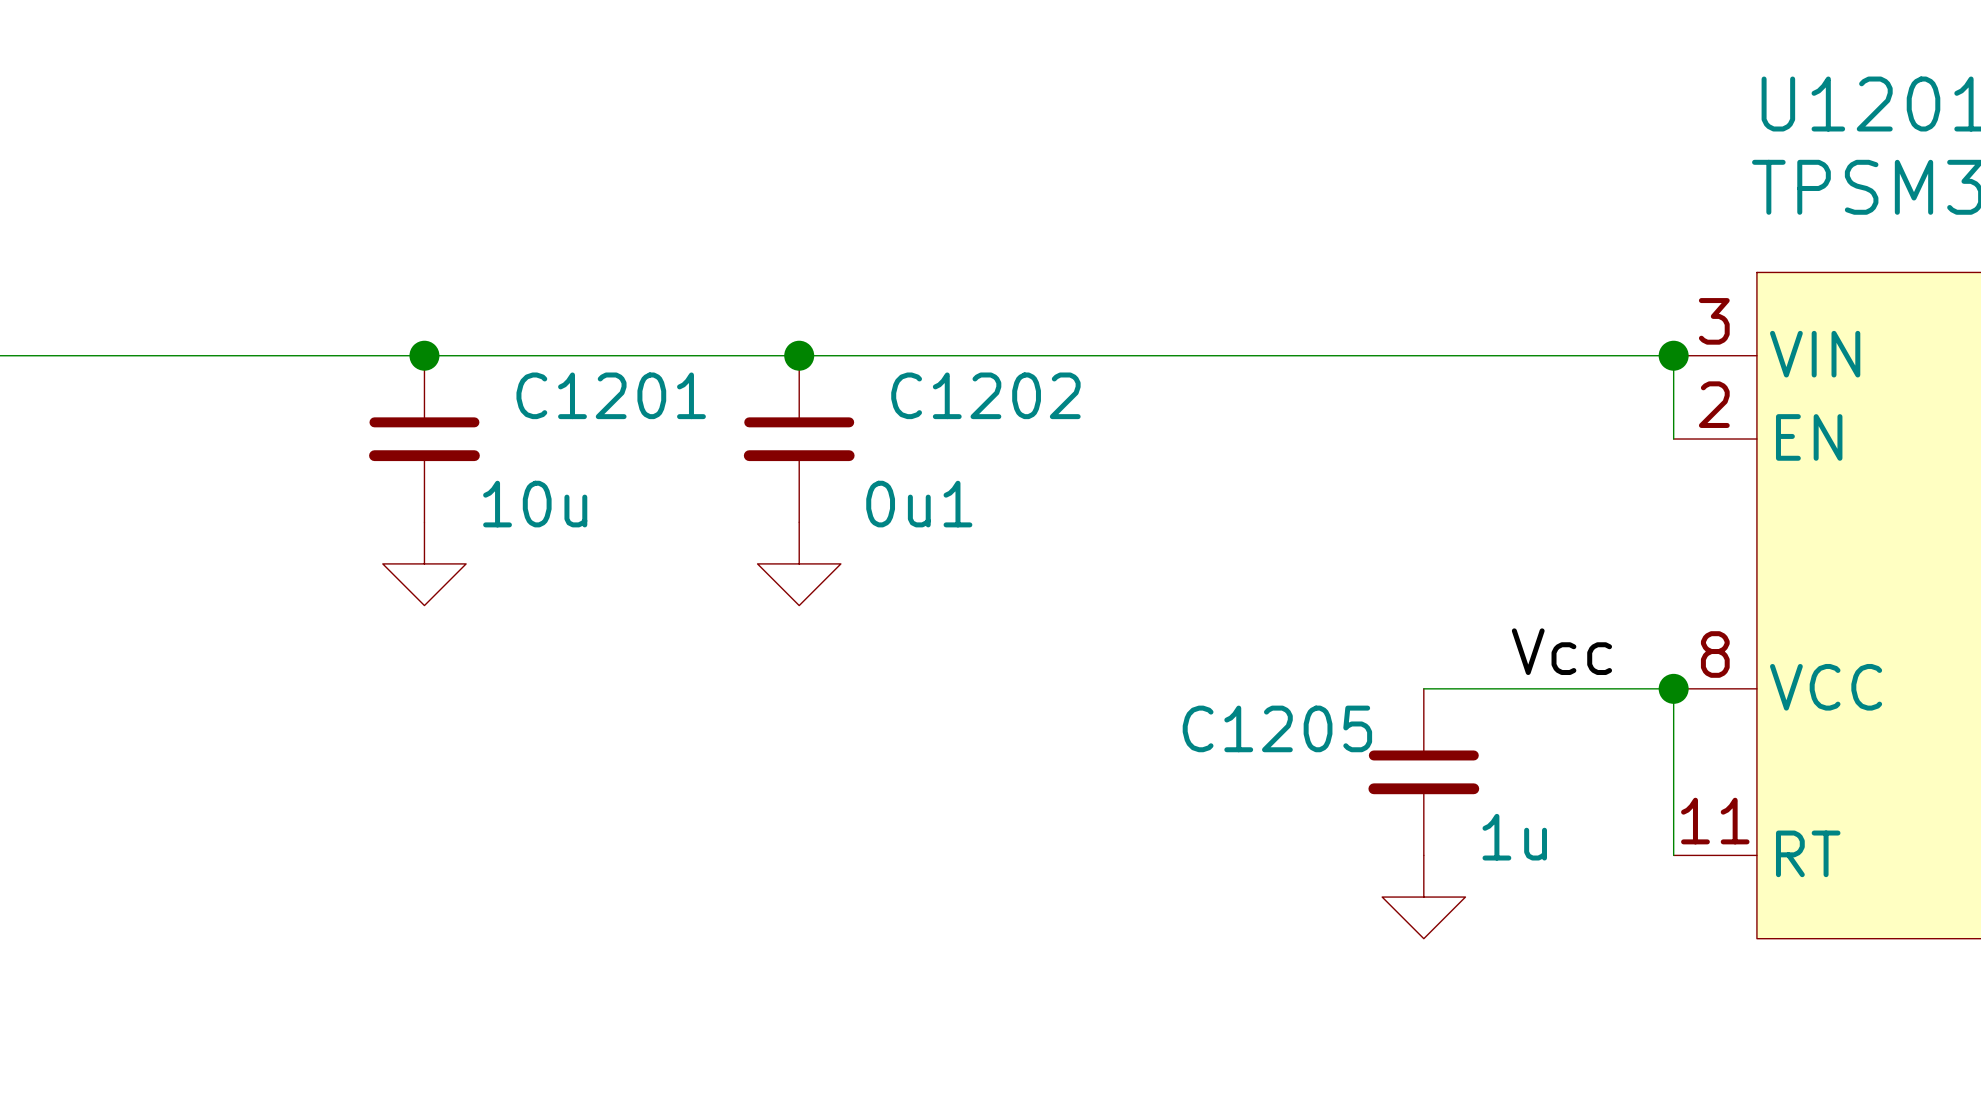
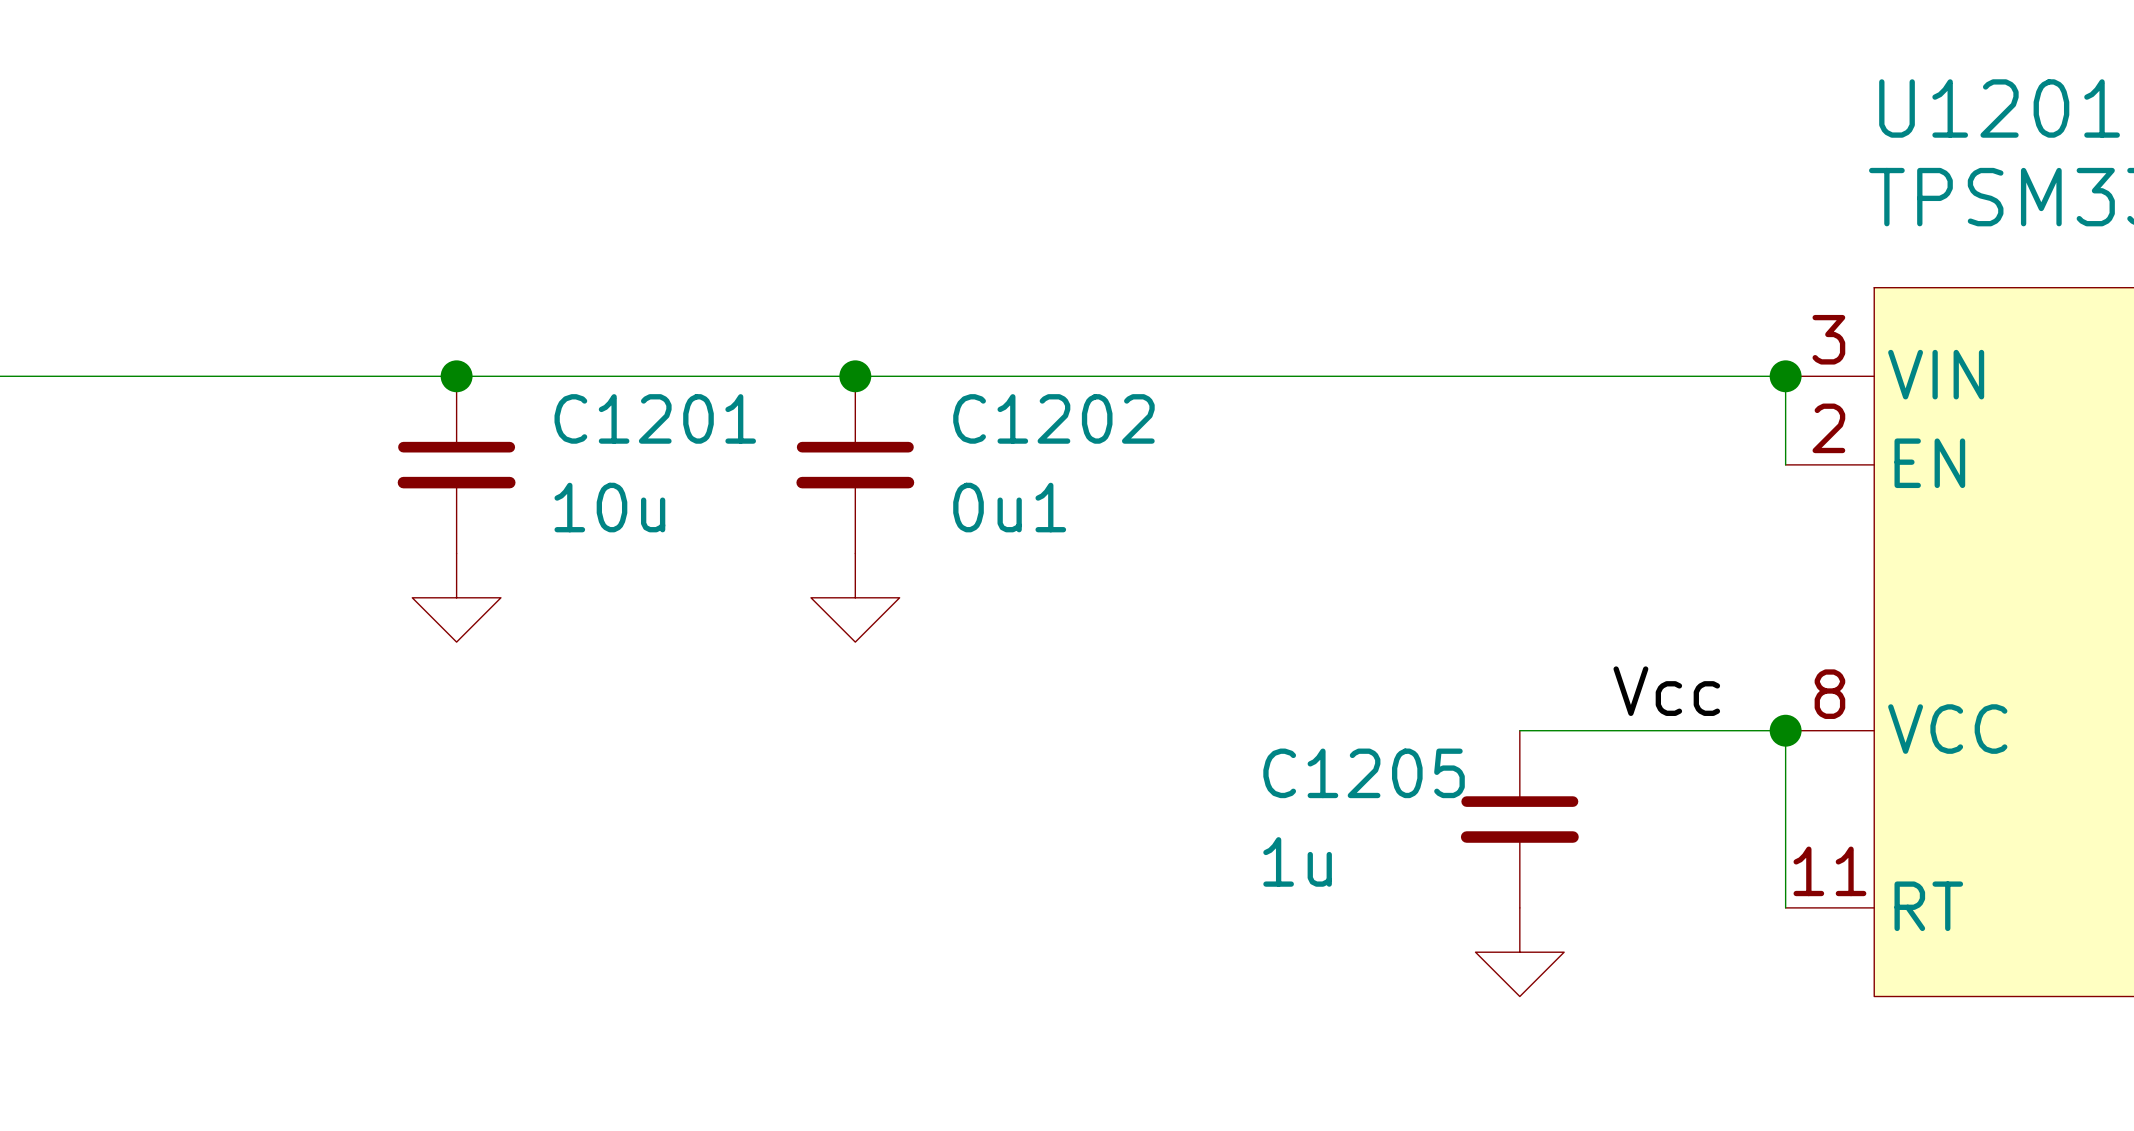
C1201 value position: 10u (535, 504) -> 10u (609, 507)
C1202 value position: 0u1 (919, 504) -> 0u1 (1009, 507)
C1205 value position: 1u (1514, 837) -> 1u (1297, 861)

